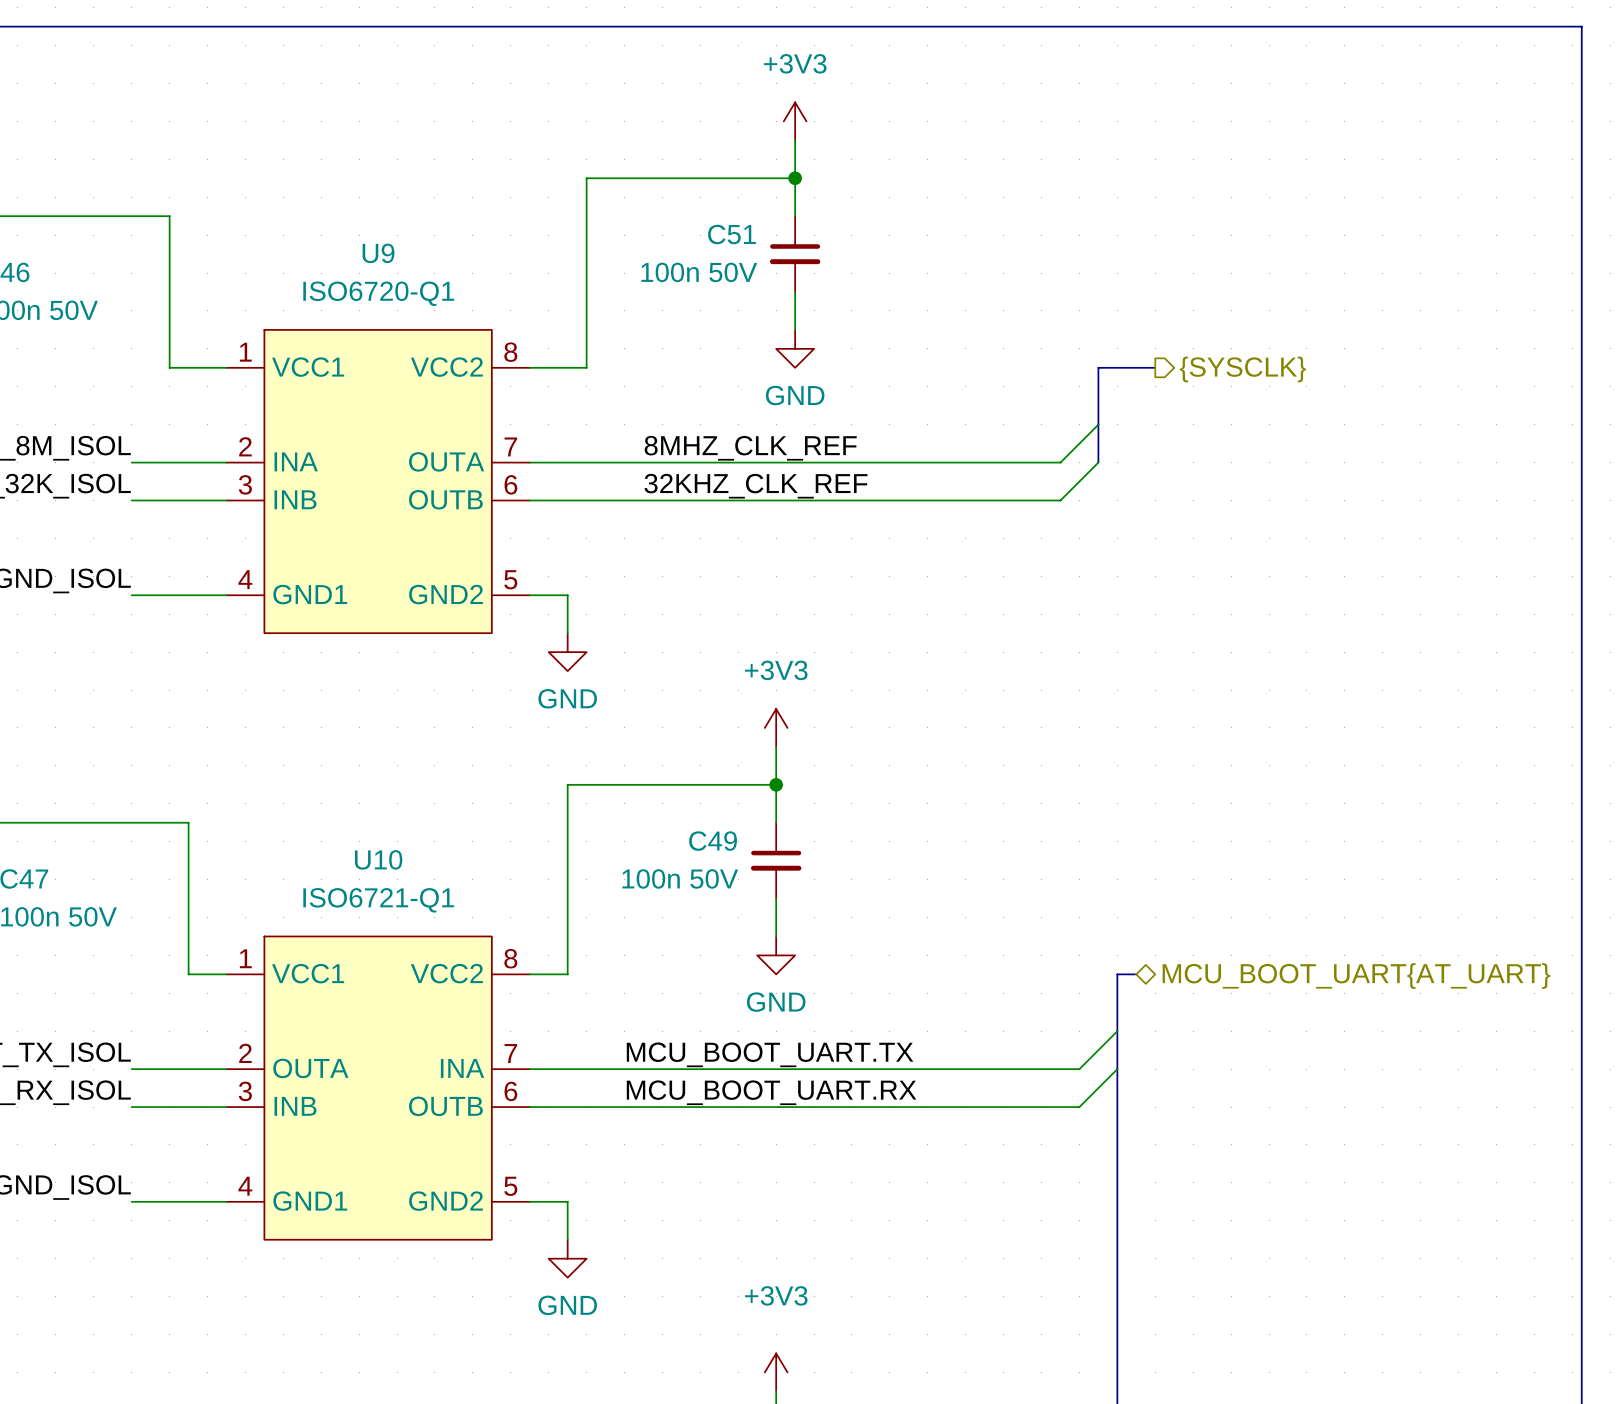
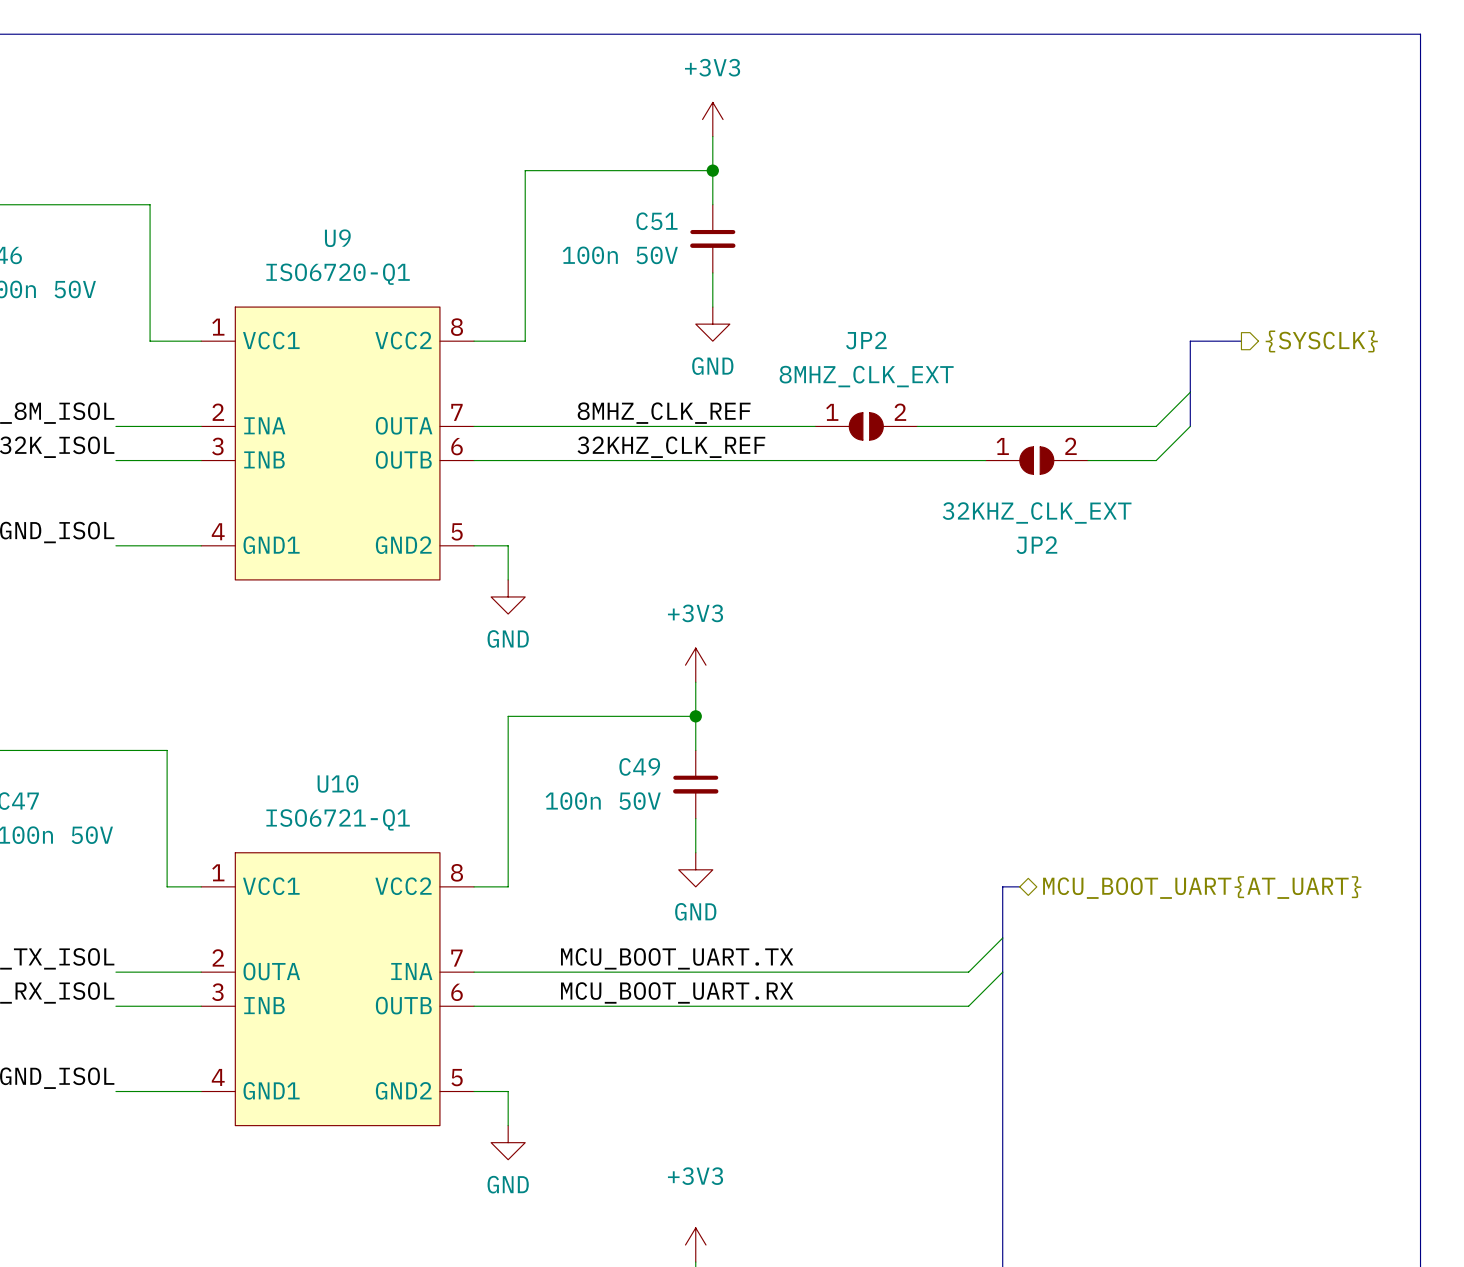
bus: (1155, 367) (1098, 367) (1098, 462) -> (1241, 341) (1190, 341) (1190, 426)
hierarchical label position: {SYSCLK} (1242, 369) -> {SYSCLK} (1321, 341)
wire: (1098, 424) (1060, 462) -> (1190, 392) (1156, 426) (951, 426)
JP2: none -> 8MHZ_CLK_EXT (866, 426)
wire: (1098, 462) (1060, 500) -> (985, 460) (951, 460)
wire: none -> (1190, 426) (1156, 460) (1087, 460)
JP2: none -> 32KHZ_CLK_EXT (1036, 460)

